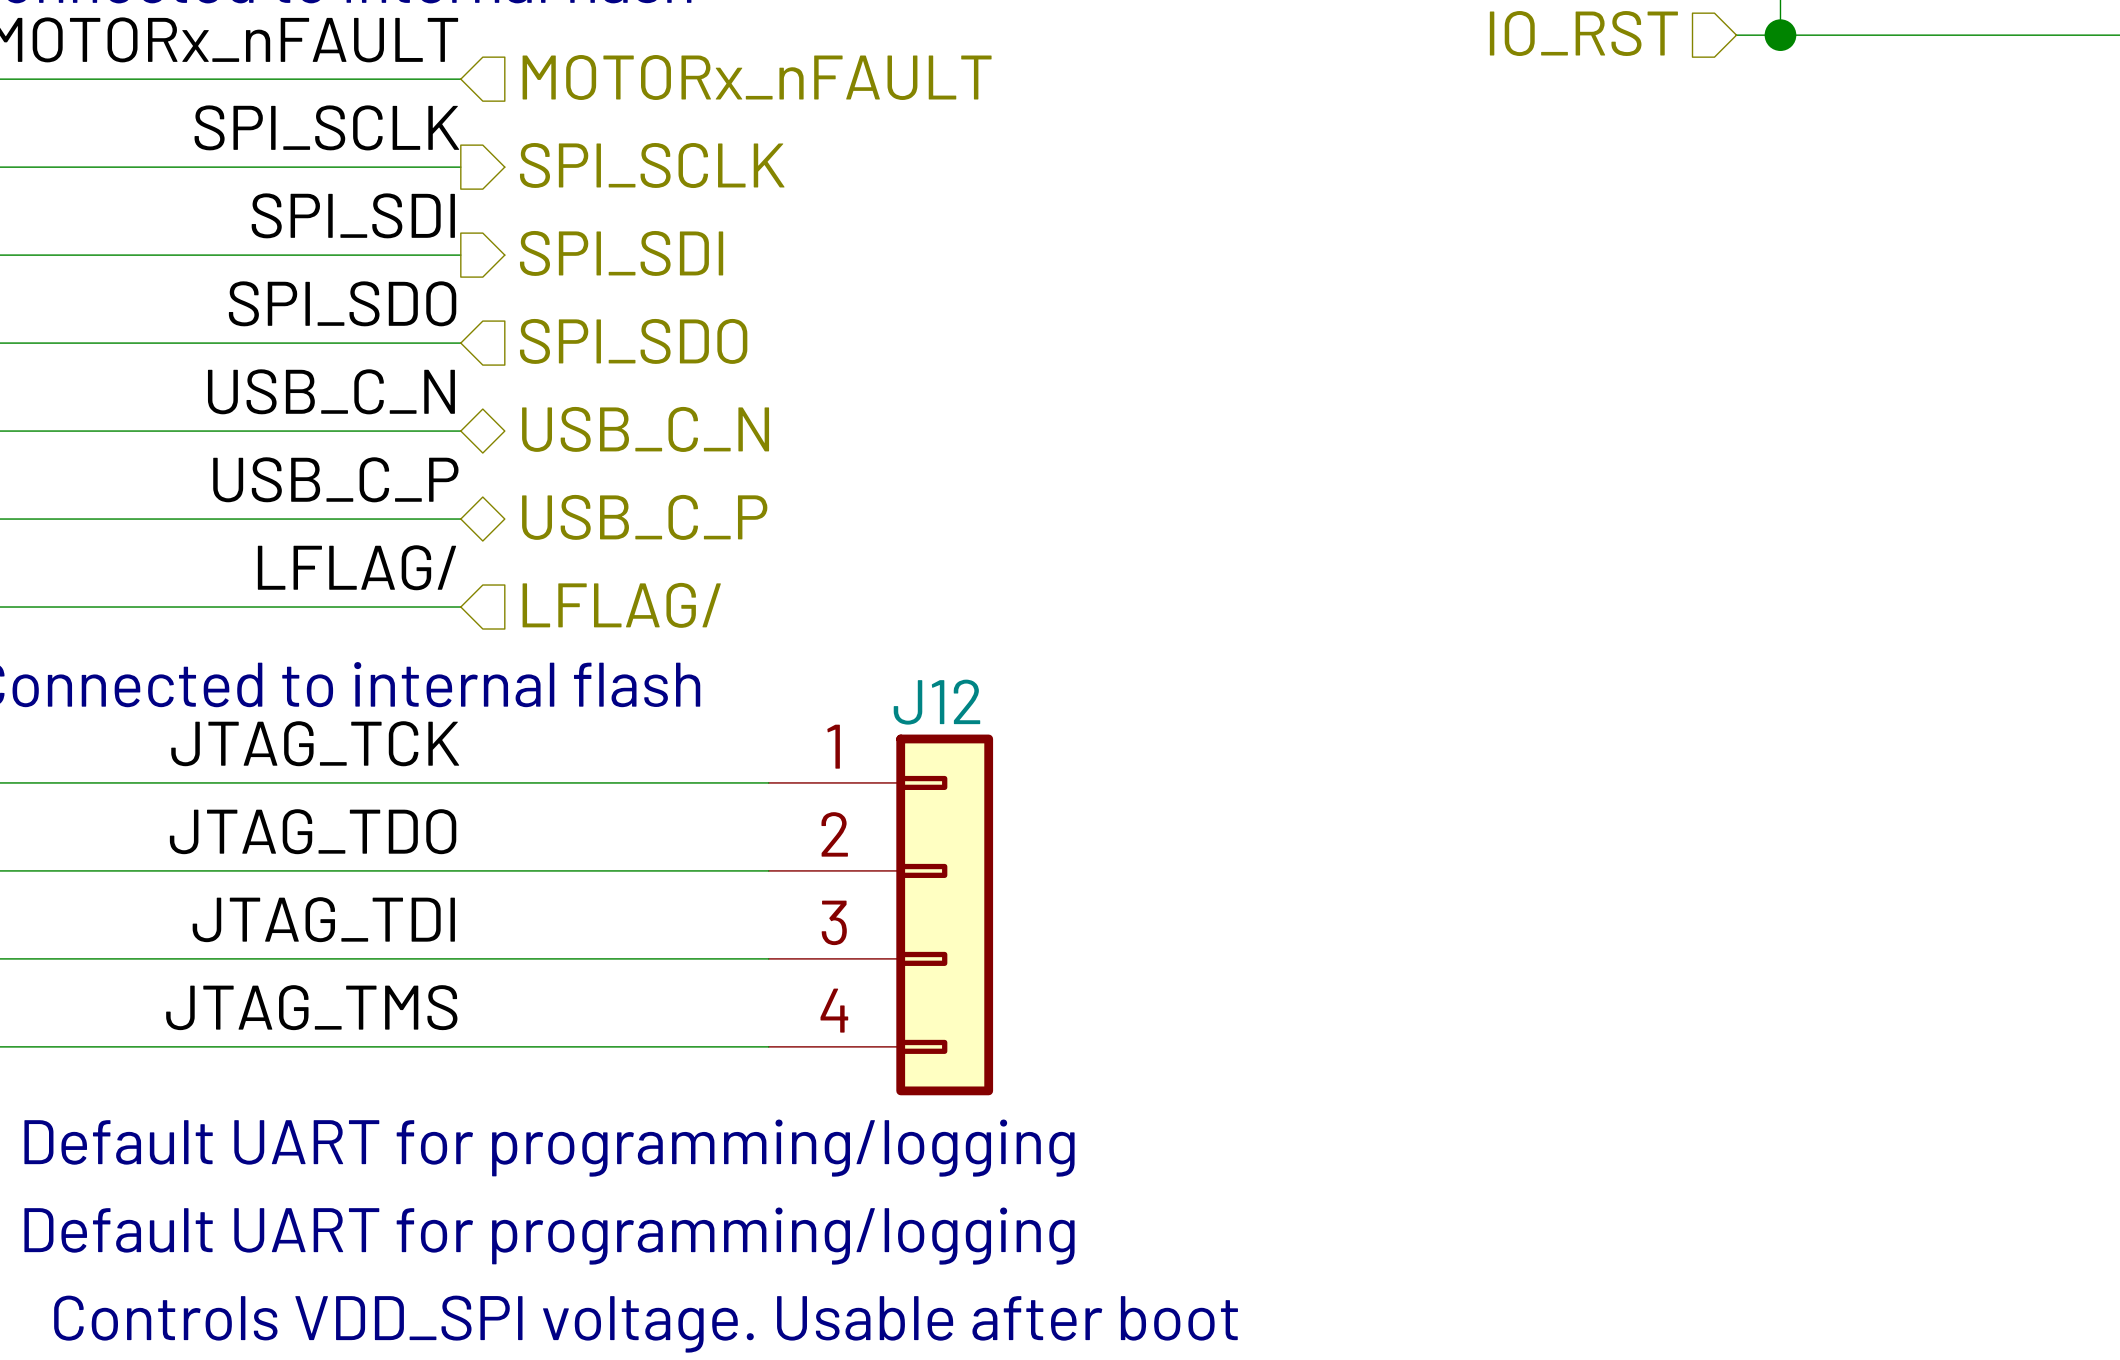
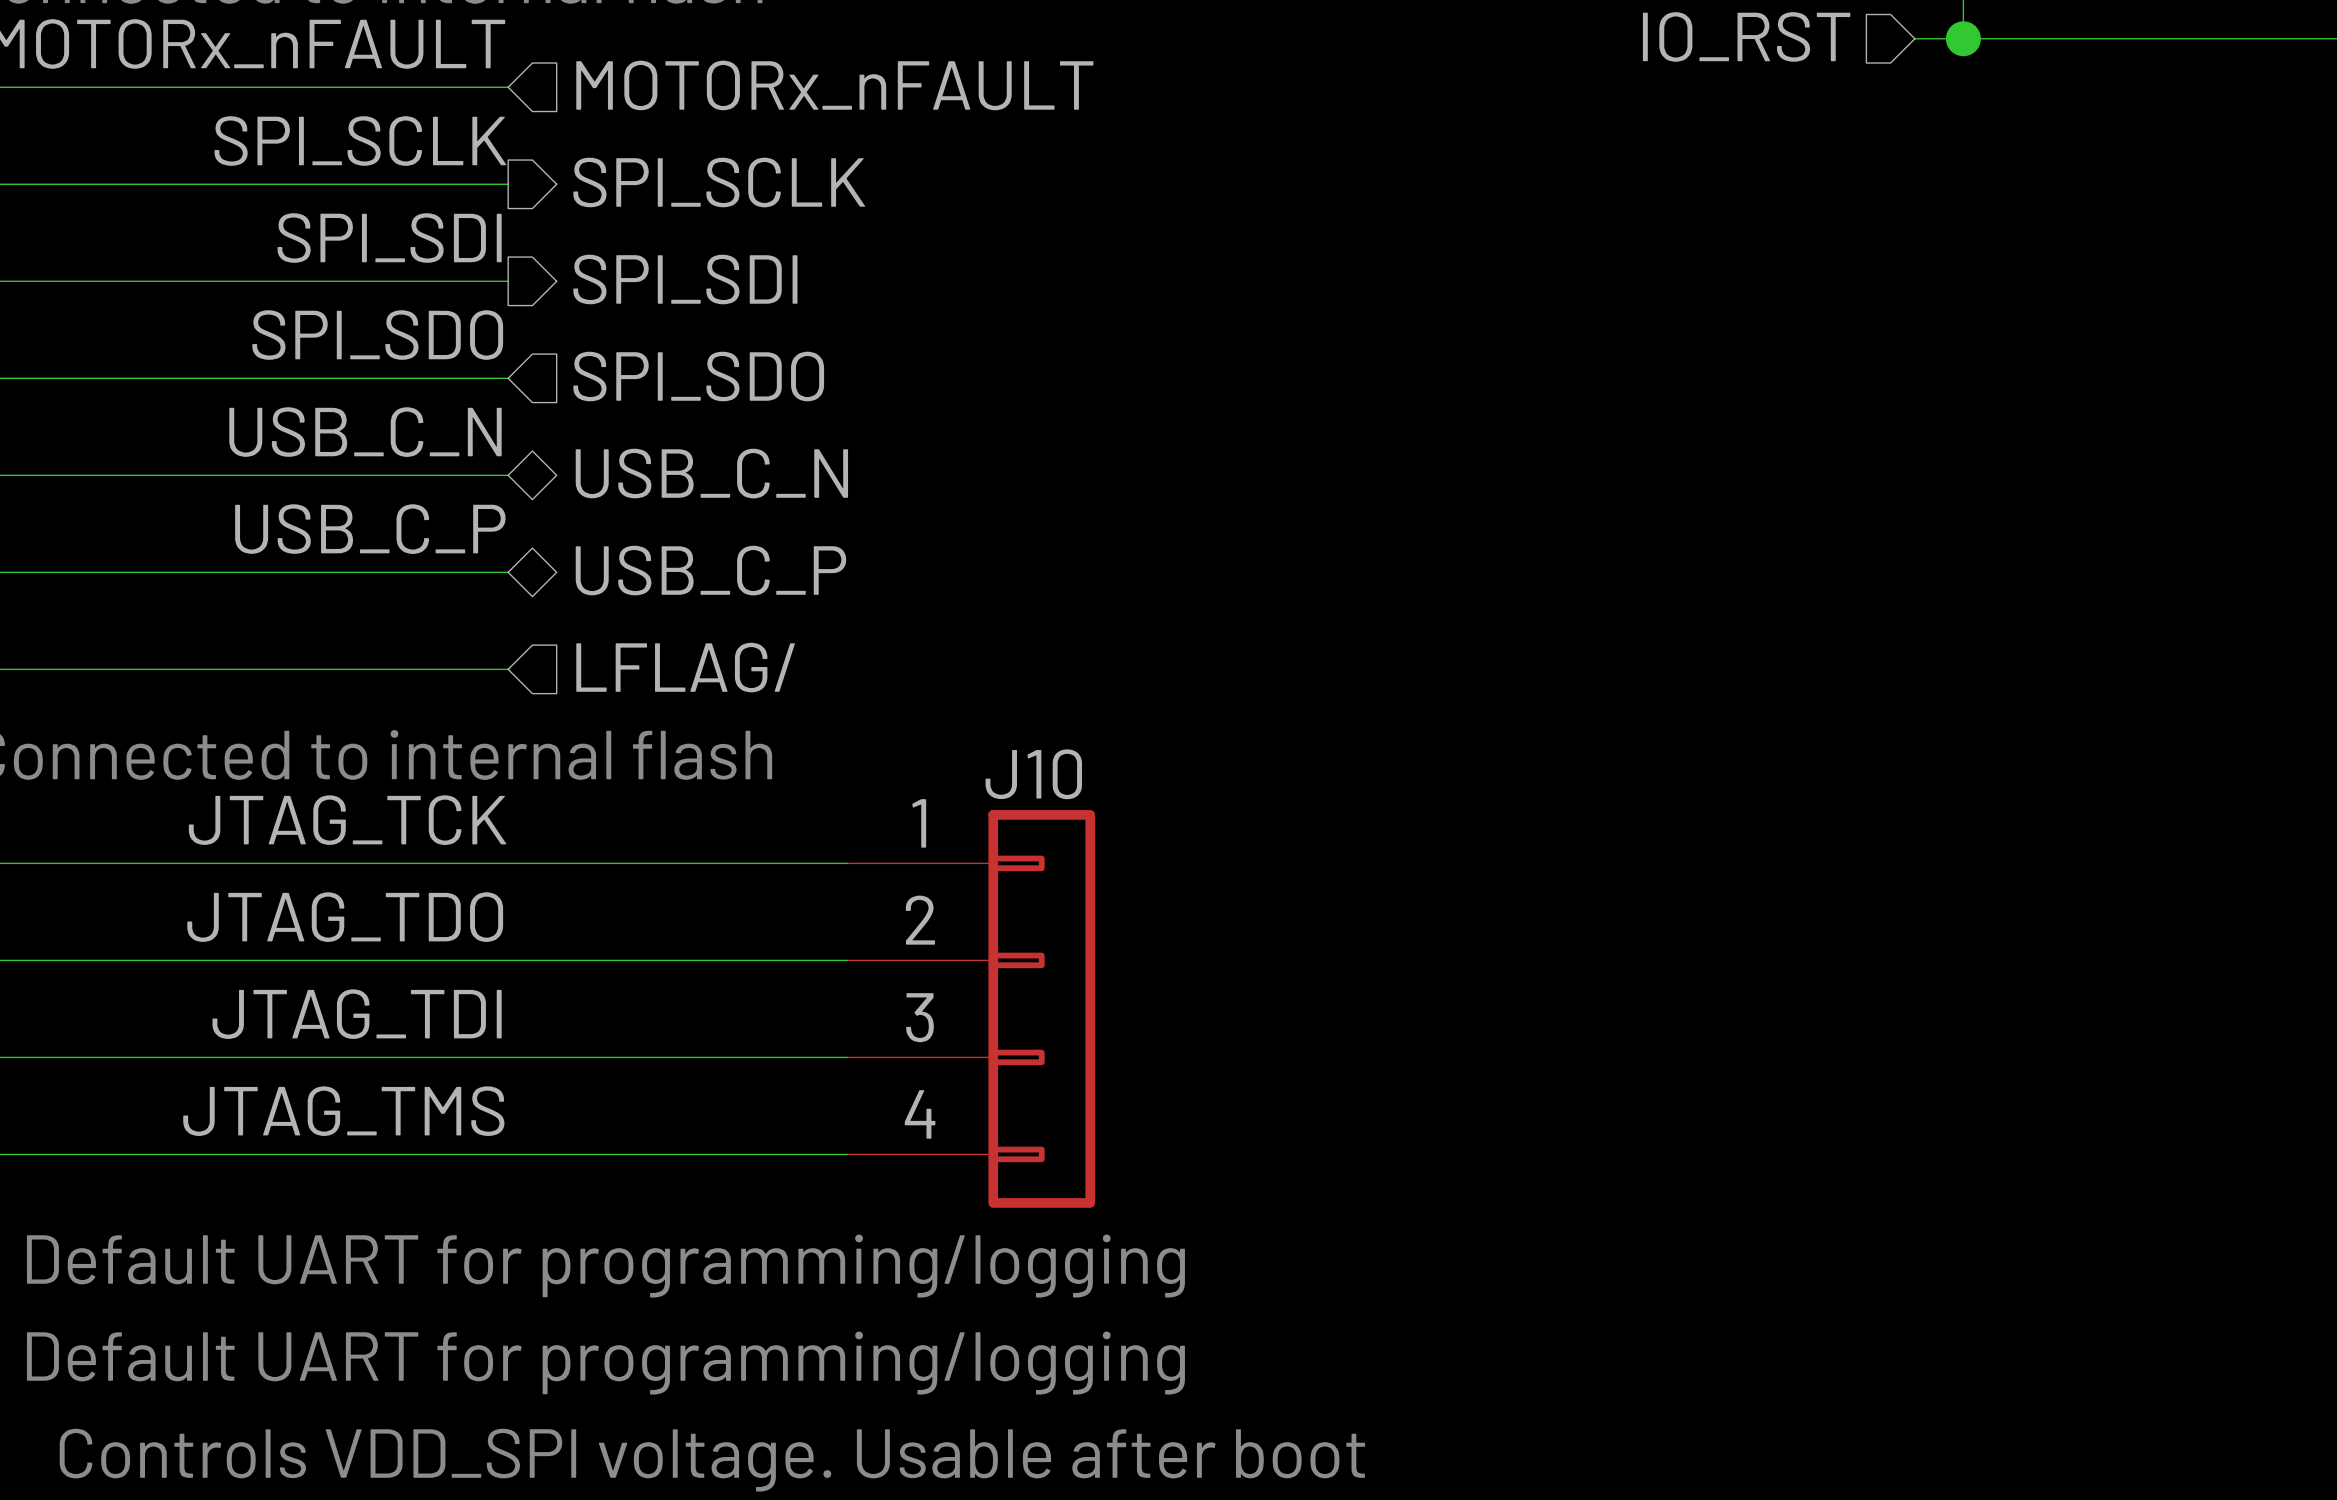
label: LFLAG/ (357, 567) -> none
J12 name: J12 (936, 702) -> J10 (1033, 774)

